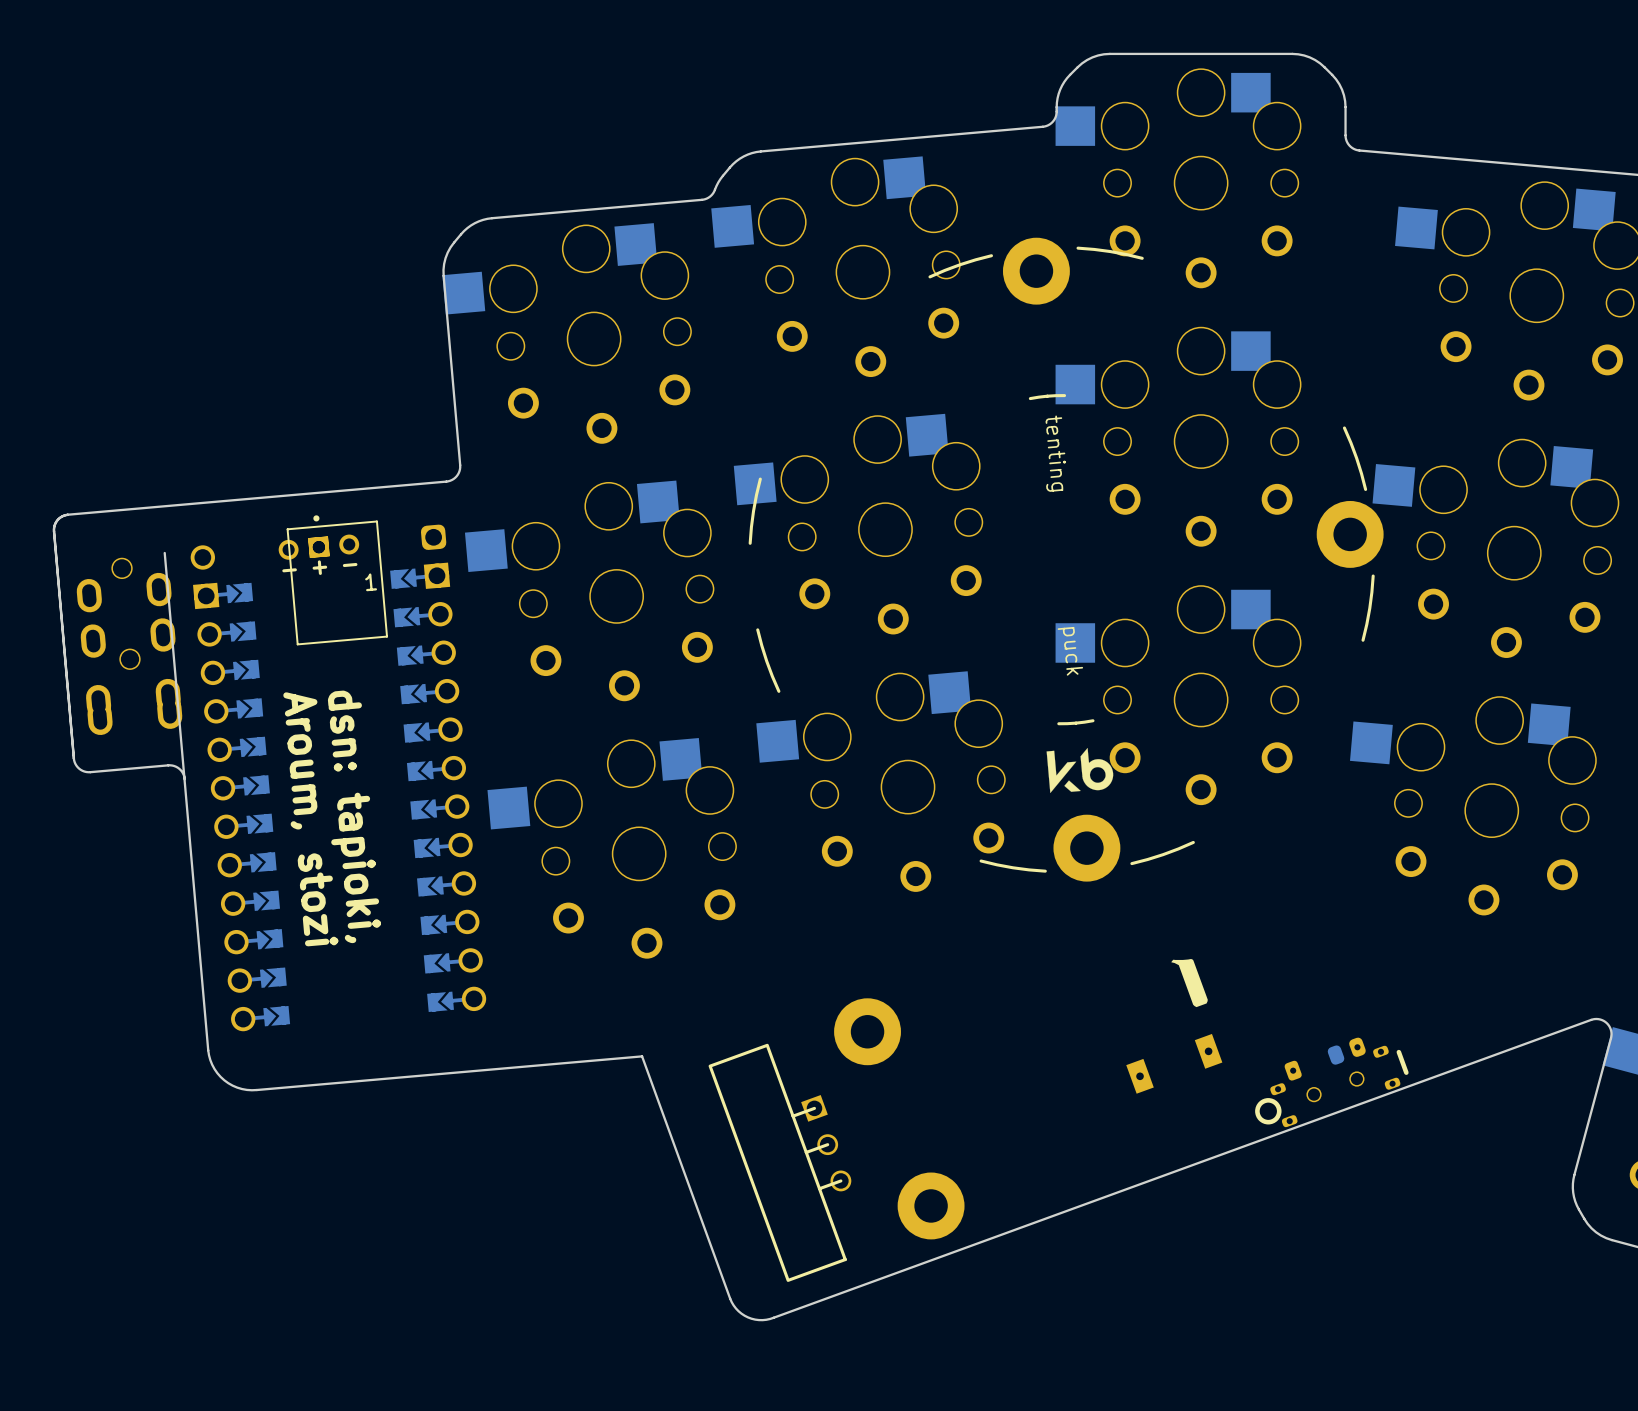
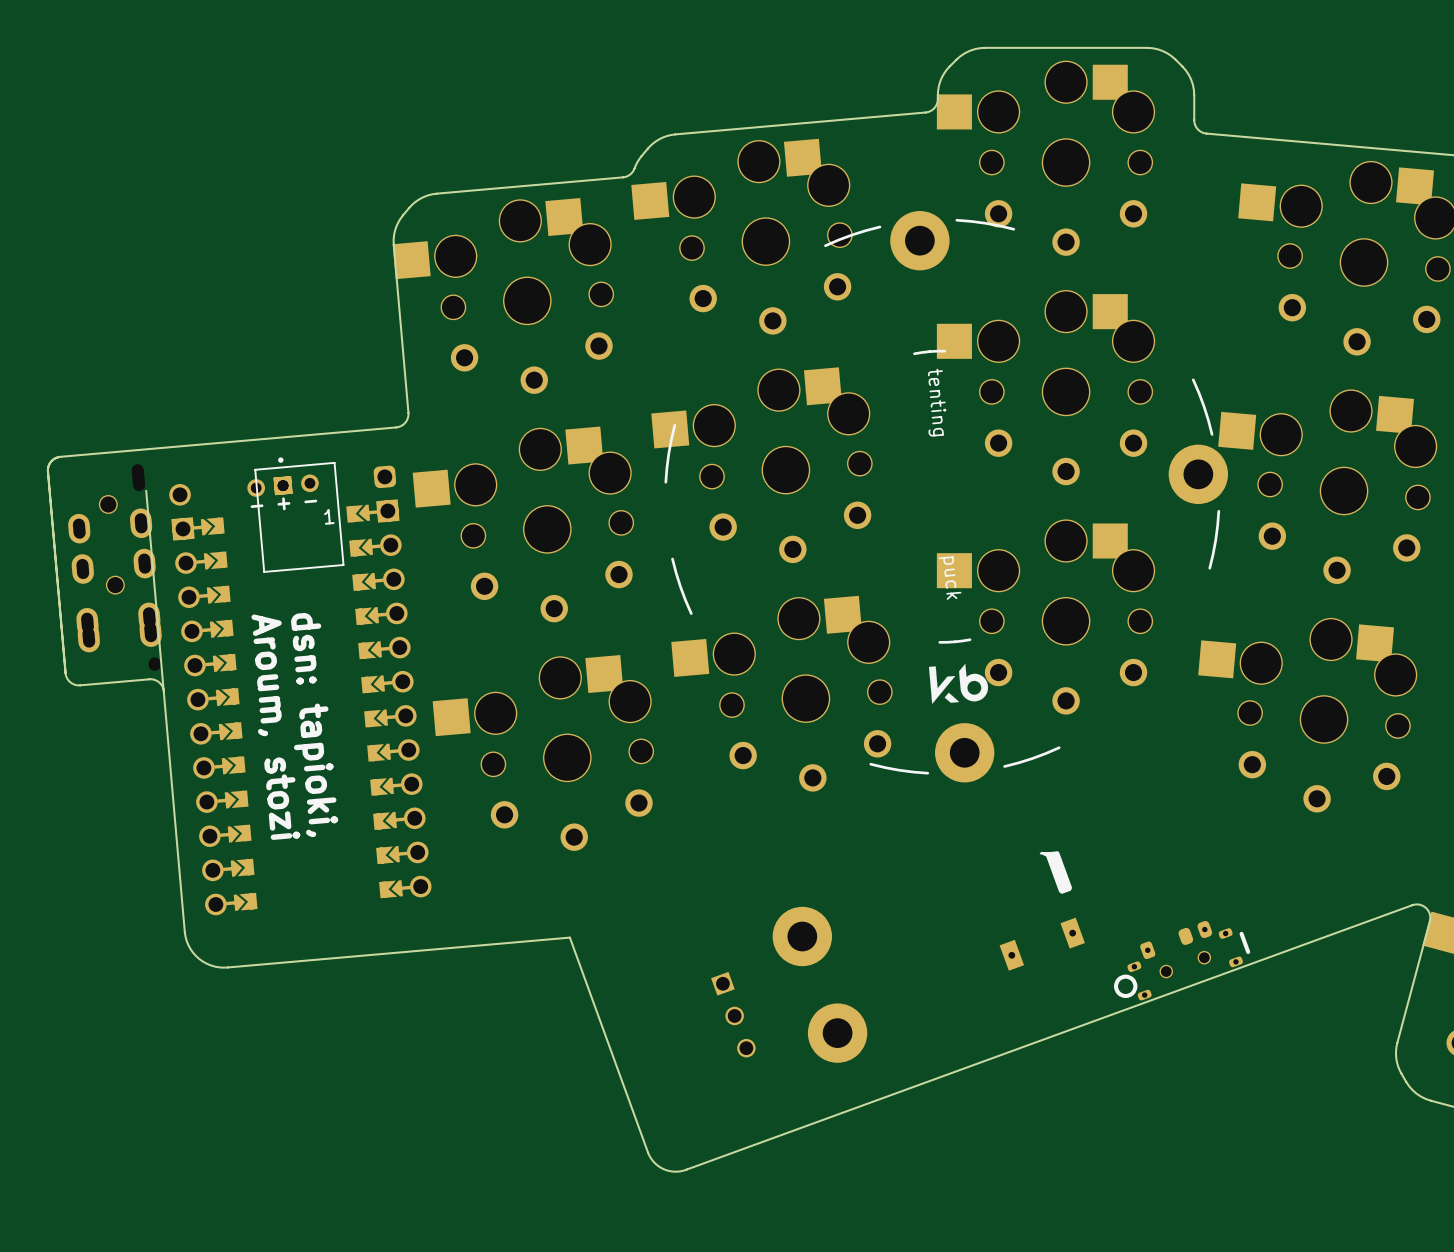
part position: (867, 1031) -> (802, 936)
part: none -> (733, 1014)
part: (779, 1162) -> none
part position: (931, 1205) -> (837, 1033)

